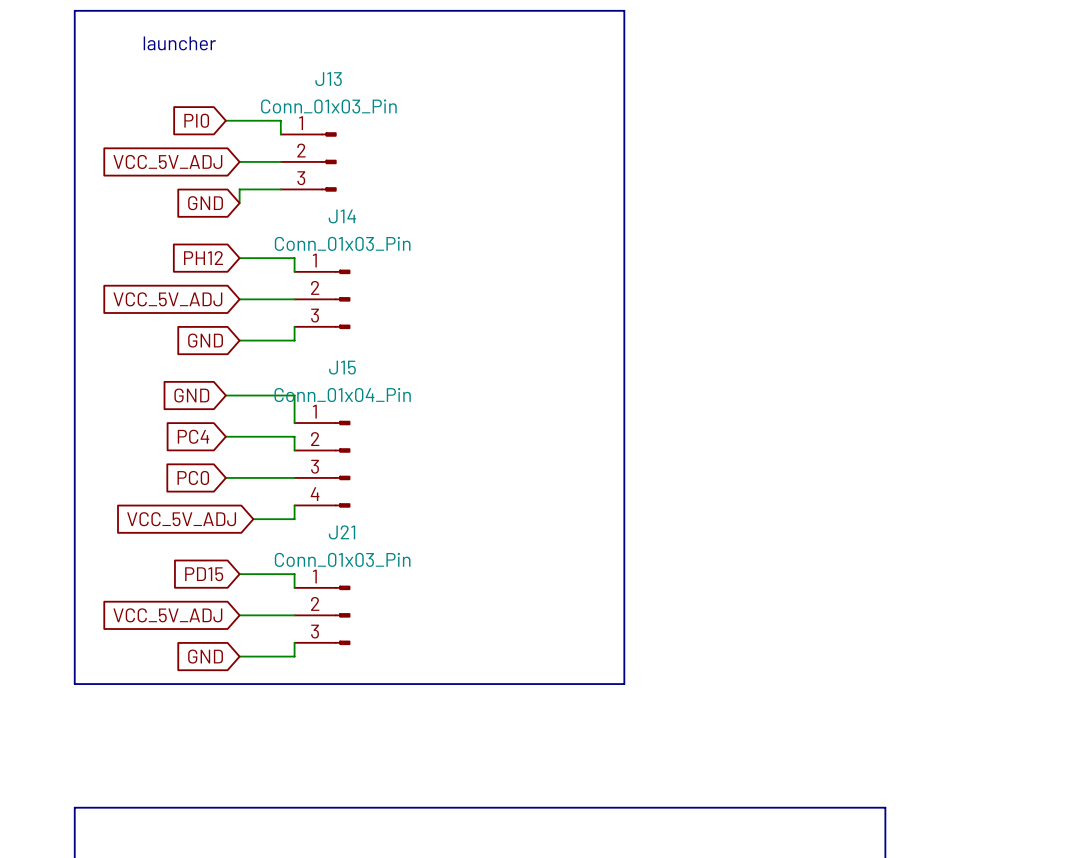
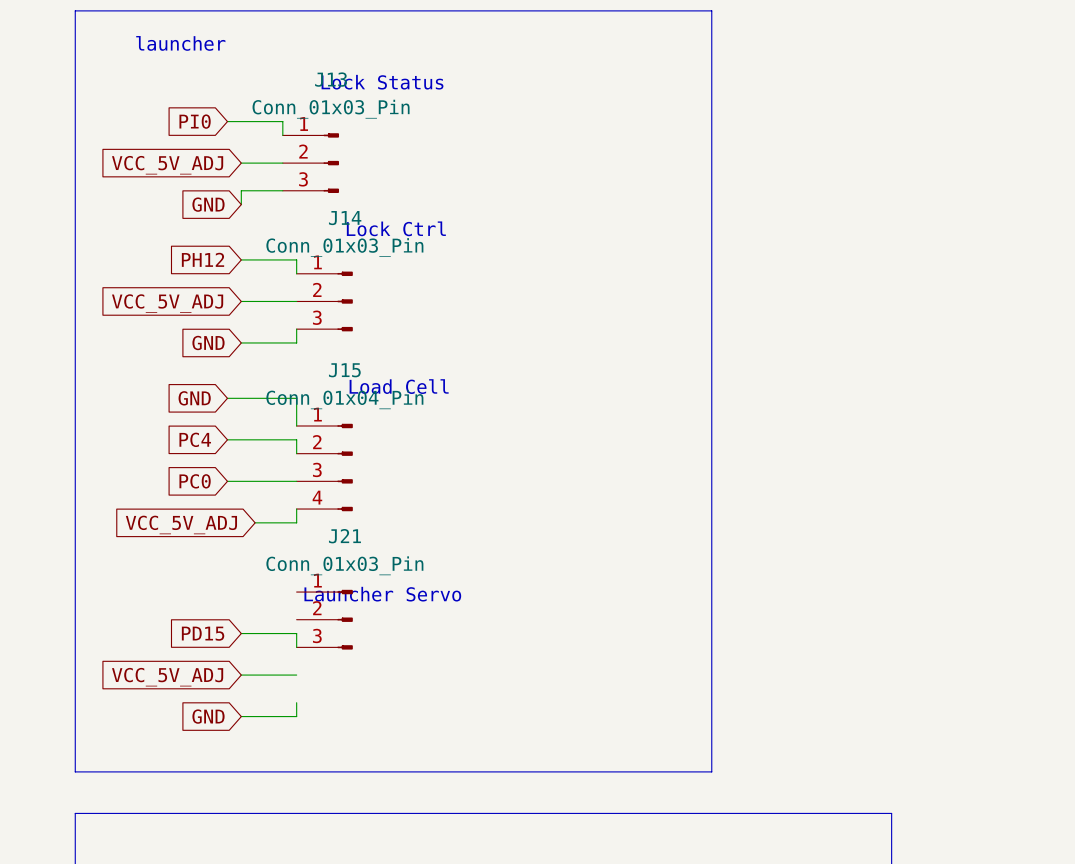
line: (624, 10) (624, 684) (74, 684) -> (628, 10) (711, 10) (711, 771) (75, 771) (75, 688)
text: none -> Lock Status (382, 82)
text: none -> Lock Ctrl (396, 228)
text: none -> Load Cell (399, 386)
global label position: PD15 (204, 574) -> PD15 (203, 633)
wire: (239, 574) (294, 574) (294, 587) -> none
text: none -> Launcher Servo (382, 594)
global label position: VCC_5V_ADJ (167, 615) -> VCC_5V_ADJ (167, 677)
wire: (239, 615) (294, 615) -> (241, 675) (296, 675)
wire: (294, 642) (294, 656) (239, 656) -> (296, 647) (296, 633) (241, 633)
global label position: GND (205, 656) -> GND (208, 716)
wire: none -> (296, 702) (296, 716) (241, 716)

